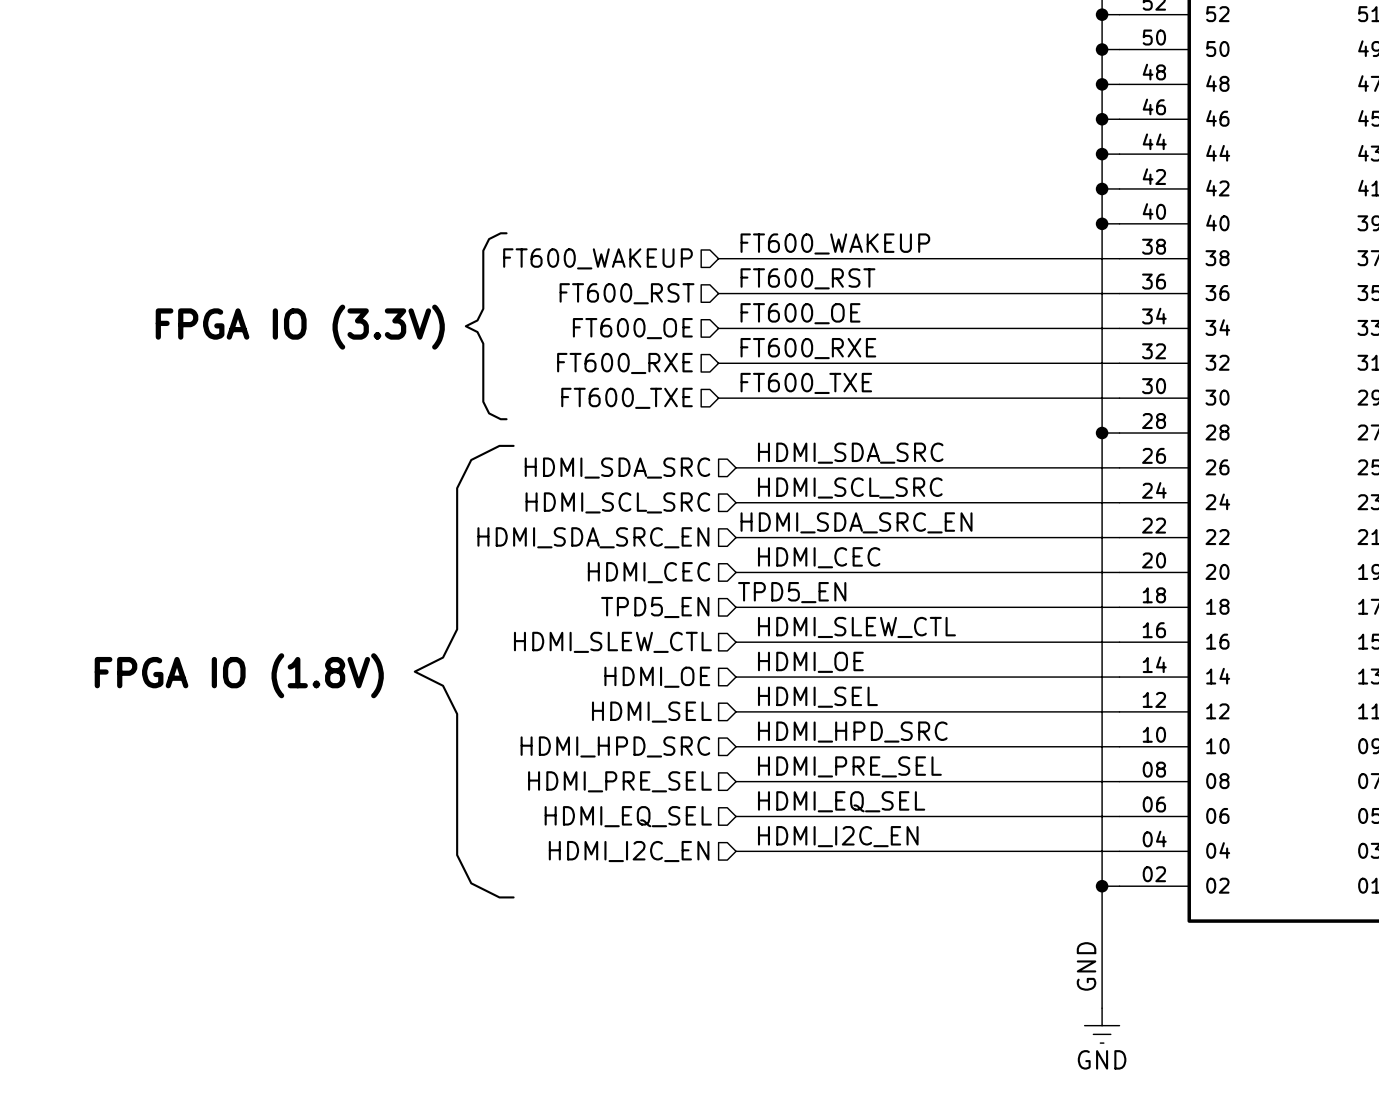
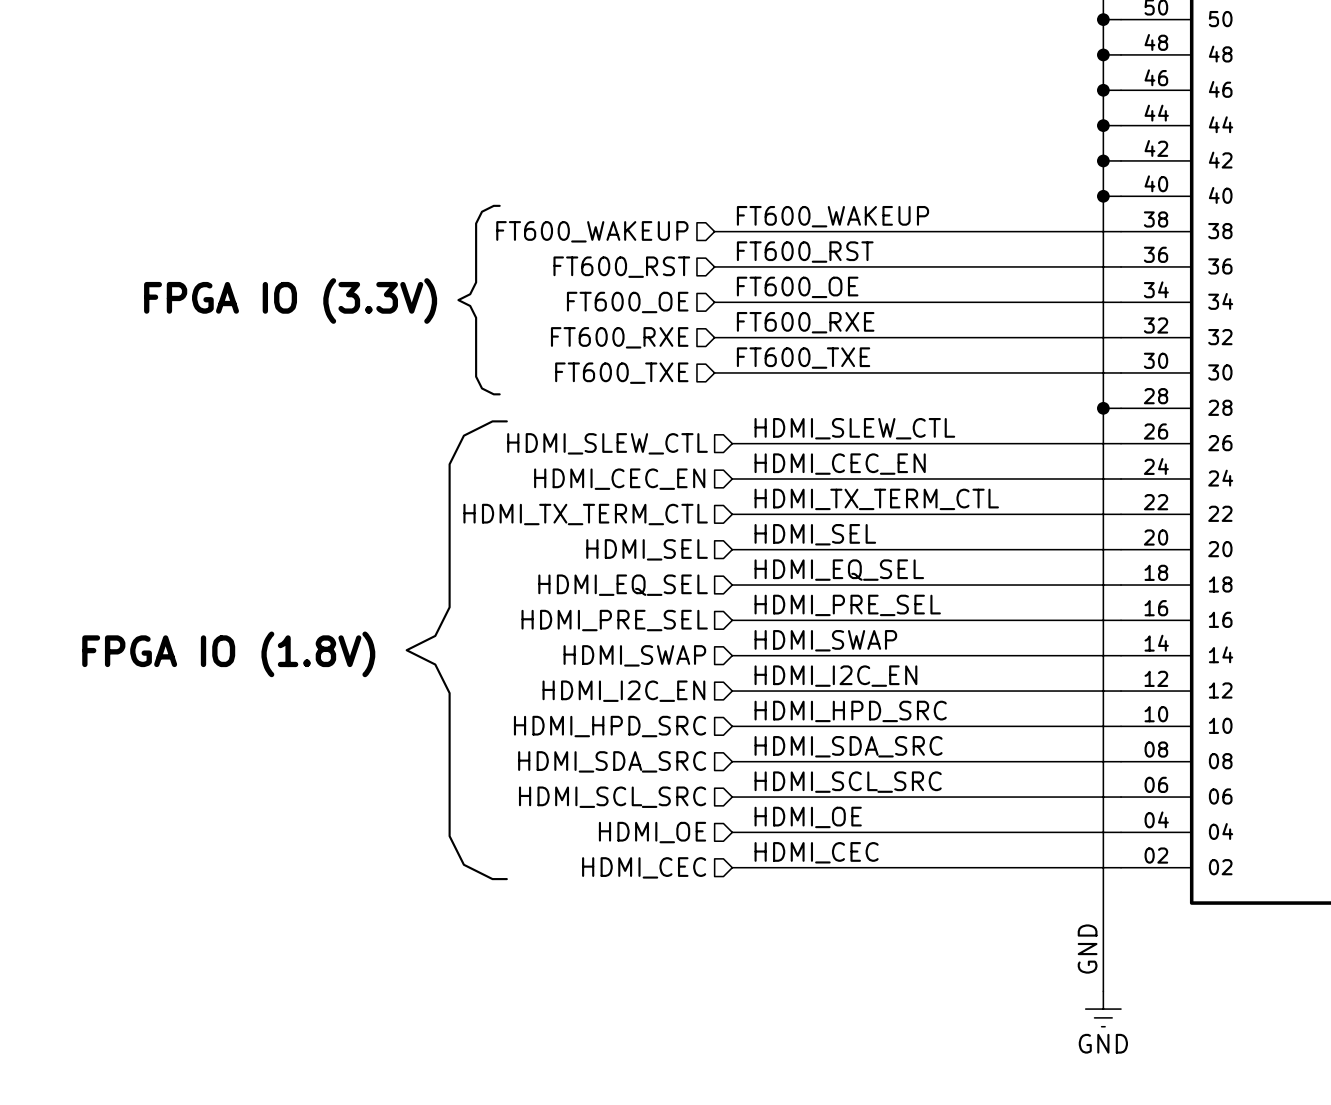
label: HDMI_SDA_SRC (850, 453) -> HDMI_SLEW_CTL (854, 428)
hierarchical label: HDMI_SDA_SRC (617, 468) -> HDMI_SLEW_CTL (607, 443)
label: HDMI_SCL_SRC (850, 488) -> HDMI_CEC_EN (840, 464)
hierarchical label: HDMI_SCL_SRC (617, 502) -> HDMI_CEC_EN (619, 479)
label: HDMI_SDA_SRC_EN (856, 522) -> none
label: none -> HDMI_TX_TERM_CTL (876, 499)
hierarchical label: HDMI_SDA_SRC_EN (593, 537) -> HDMI_TX_TERM_CTL (585, 514)
label: HDMI_CEC (819, 557) -> HDMI_SEL (815, 534)
hierarchical label: HDMI_CEC (649, 572) -> HDMI_SEL (647, 549)
label: TPD5_EN (792, 592) -> none
label: none -> HDMI_EQ_SEL (839, 570)
hierarchical label: TPD5_EN (655, 607) -> HDMI_EQ_SEL (623, 585)
label: HDMI_SLEW_CTL (856, 627) -> HDMI_PRE_SEL (847, 605)
hierarchical label: HDMI_SLEW_CTL (612, 642) -> HDMI_PRE_SEL (614, 620)
label: HDMI_OE (810, 662) -> HDMI_SWAP (825, 640)
hierarchical label: HDMI_OE (657, 677) -> HDMI_SWAP (634, 655)
label: HDMI_SEL (817, 697) -> HDMI_I2C_EN (835, 676)
hierarchical label: HDMI_SEL (651, 712) -> HDMI_I2C_EN (623, 691)
label: HDMI_PRE_SEL (849, 766) -> HDMI_SDA_SRC (848, 746)
hierarchical label: HDMI_PRE_SEL (619, 781) -> HDMI_SDA_SRC (612, 761)
label: HDMI_EQ_SEL (841, 801) -> HDMI_SCL_SRC (848, 782)
hierarchical label: HDMI_EQ_SEL (628, 816) -> HDMI_SCL_SRC (612, 797)
label: HDMI_I2C_EN (838, 836) -> HDMI_OE (808, 817)
hierarchical label: HDMI_I2C_EN (629, 851) -> HDMI_OE (652, 832)
label: none -> HDMI_CEC (816, 852)
hierarchical label: none -> HDMI_CEC (644, 867)
wire: none -> (732, 867) (1103, 867)
junction: (1102, 886) -> none

